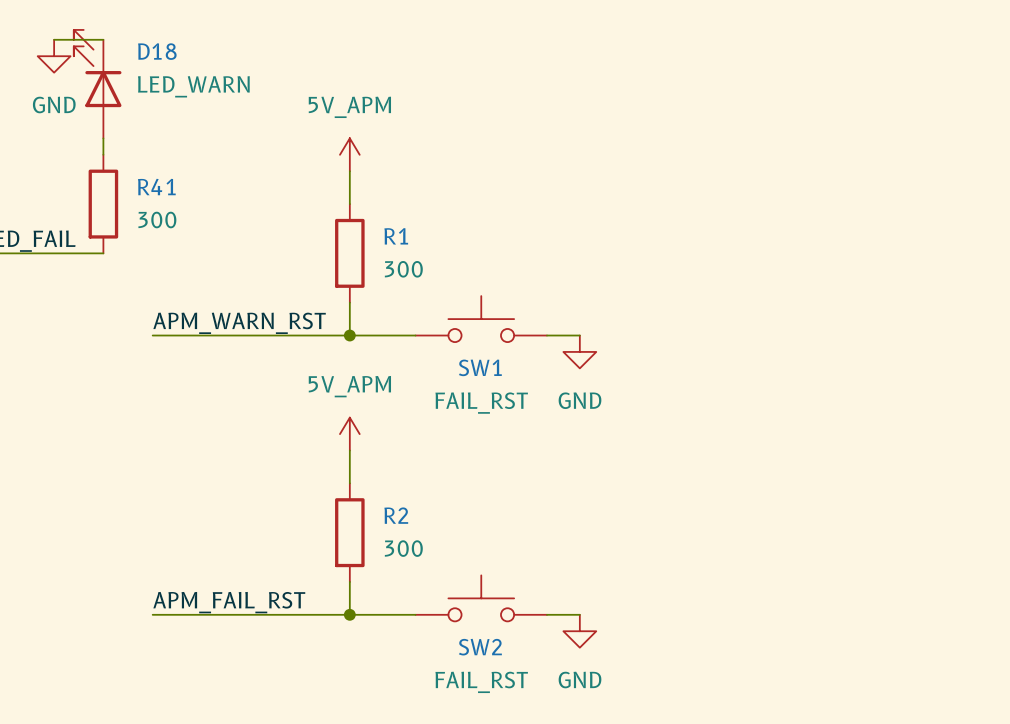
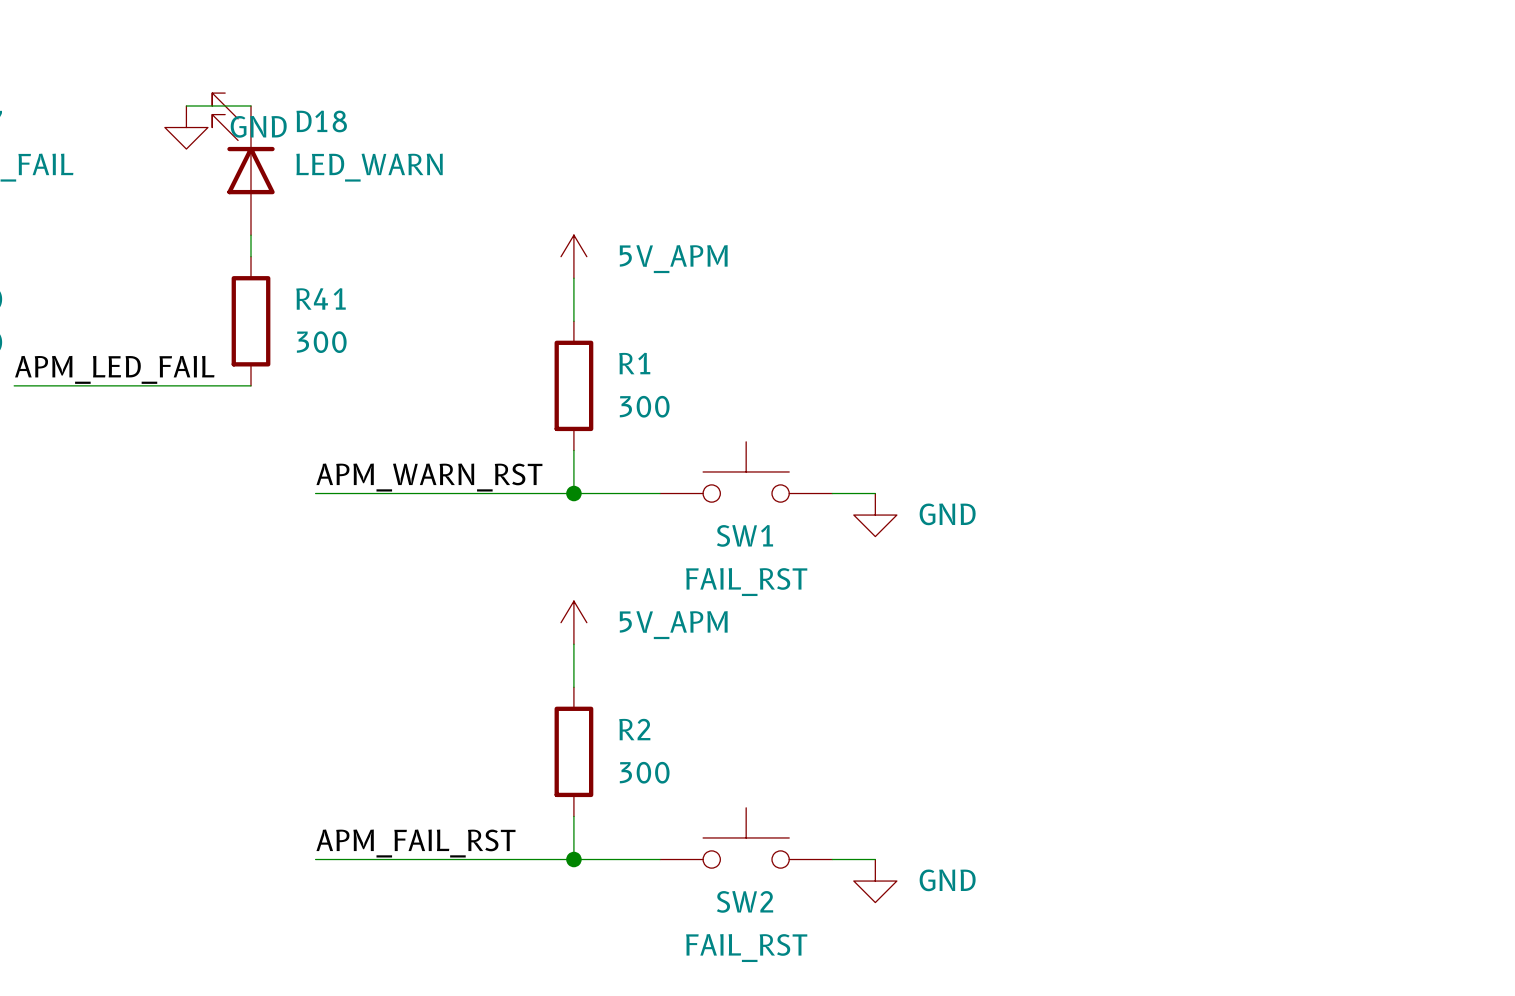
power symbol text position: GND (54, 104) -> GND (258, 126)
power symbol text position: 5V_APM (349, 107) -> 5V_APM (673, 259)
power symbol text position: 5V_APM (349, 386) -> 5V_APM (673, 625)
power symbol text position: GND (580, 400) -> GND (947, 514)
power symbol text position: GND (580, 680) -> GND (947, 880)

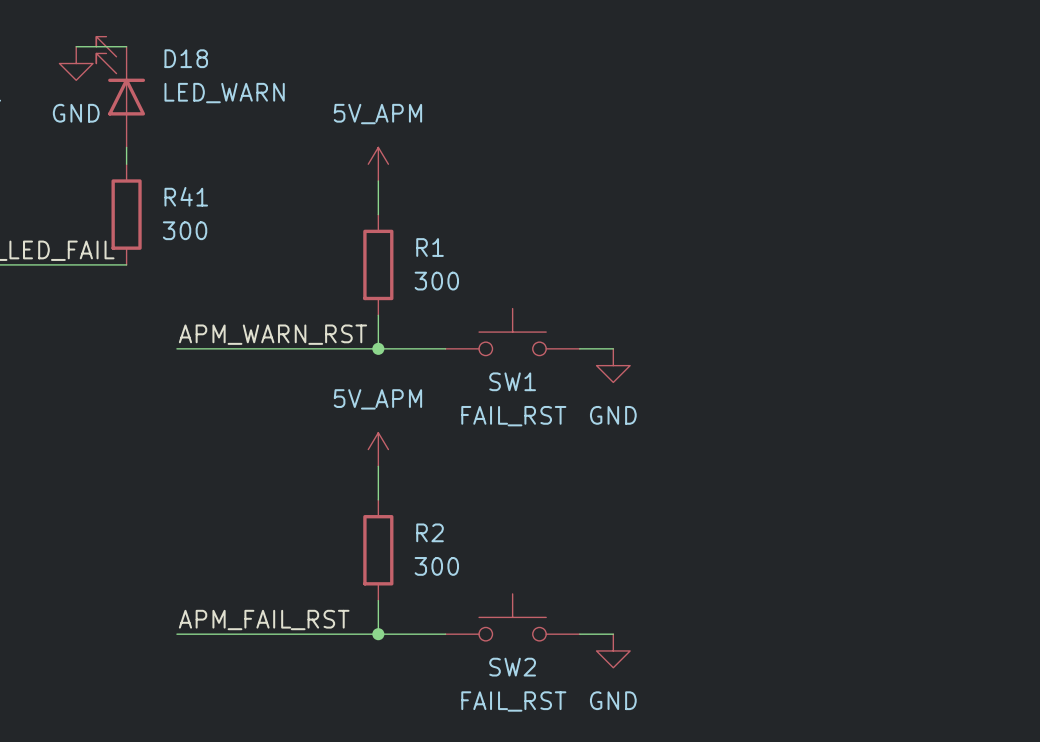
power symbol text position: GND (258, 126) -> GND (76, 113)
power symbol text position: 5V_APM (673, 259) -> 5V_APM (377, 114)
power symbol text position: GND (947, 514) -> GND (613, 415)
power symbol text position: 5V_APM (673, 625) -> 5V_APM (377, 399)
power symbol text position: GND (947, 880) -> GND (613, 700)

